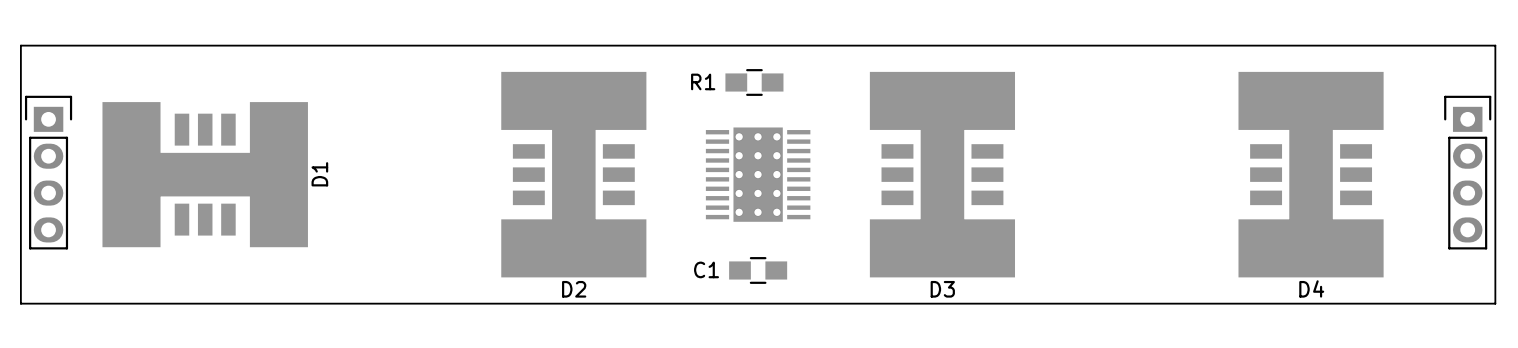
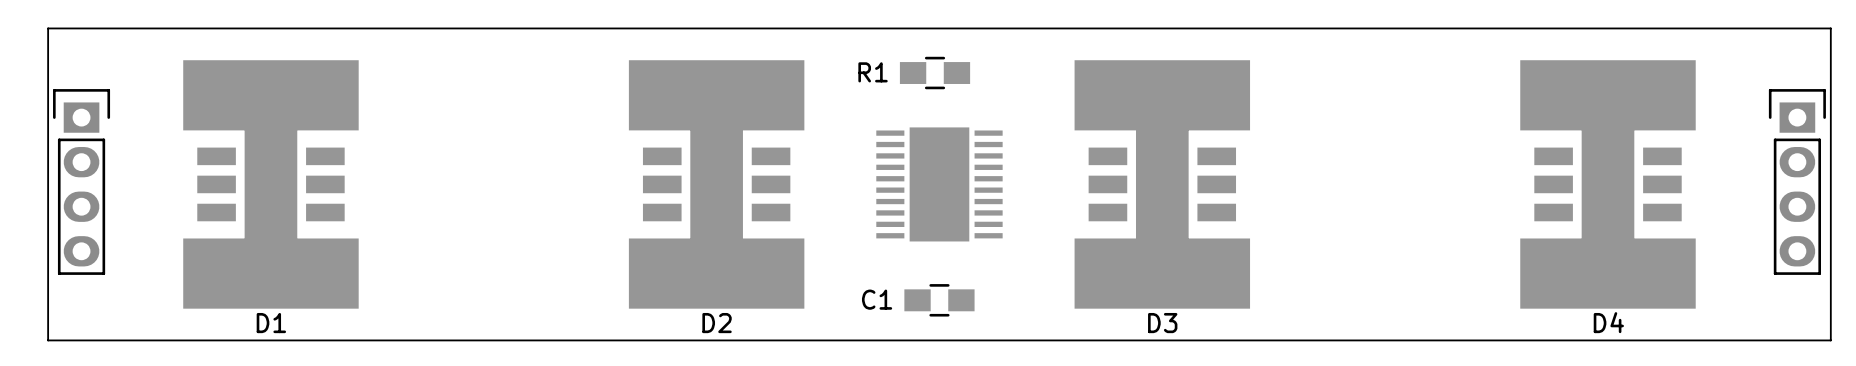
part footprint: [705, 127, 811, 222] -> [876, 127, 1003, 242]
D1 rotation: 0° (205, 174) -> 90° clockwise (270, 184)

